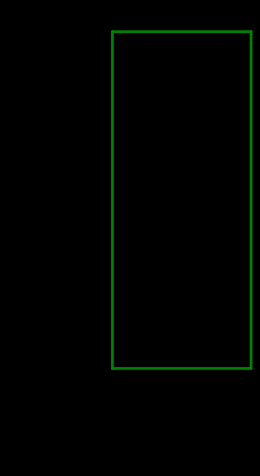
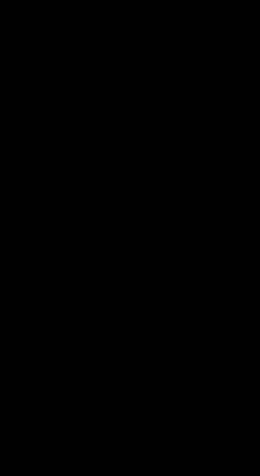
track: (251, 31) (112, 31) (112, 368) (251, 368) (251, 31) -> none

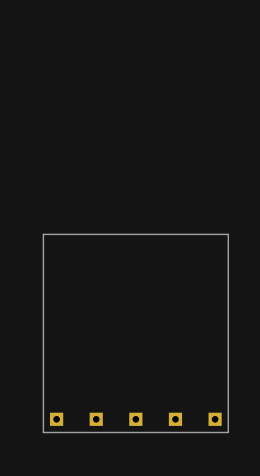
board edge: none -> (228, 234) (43, 234) (43, 432) (228, 432) (228, 234)
part: none -> (56, 419)
part: none -> (96, 419)
part: none -> (135, 419)
part: none -> (175, 419)
part: none -> (215, 419)

